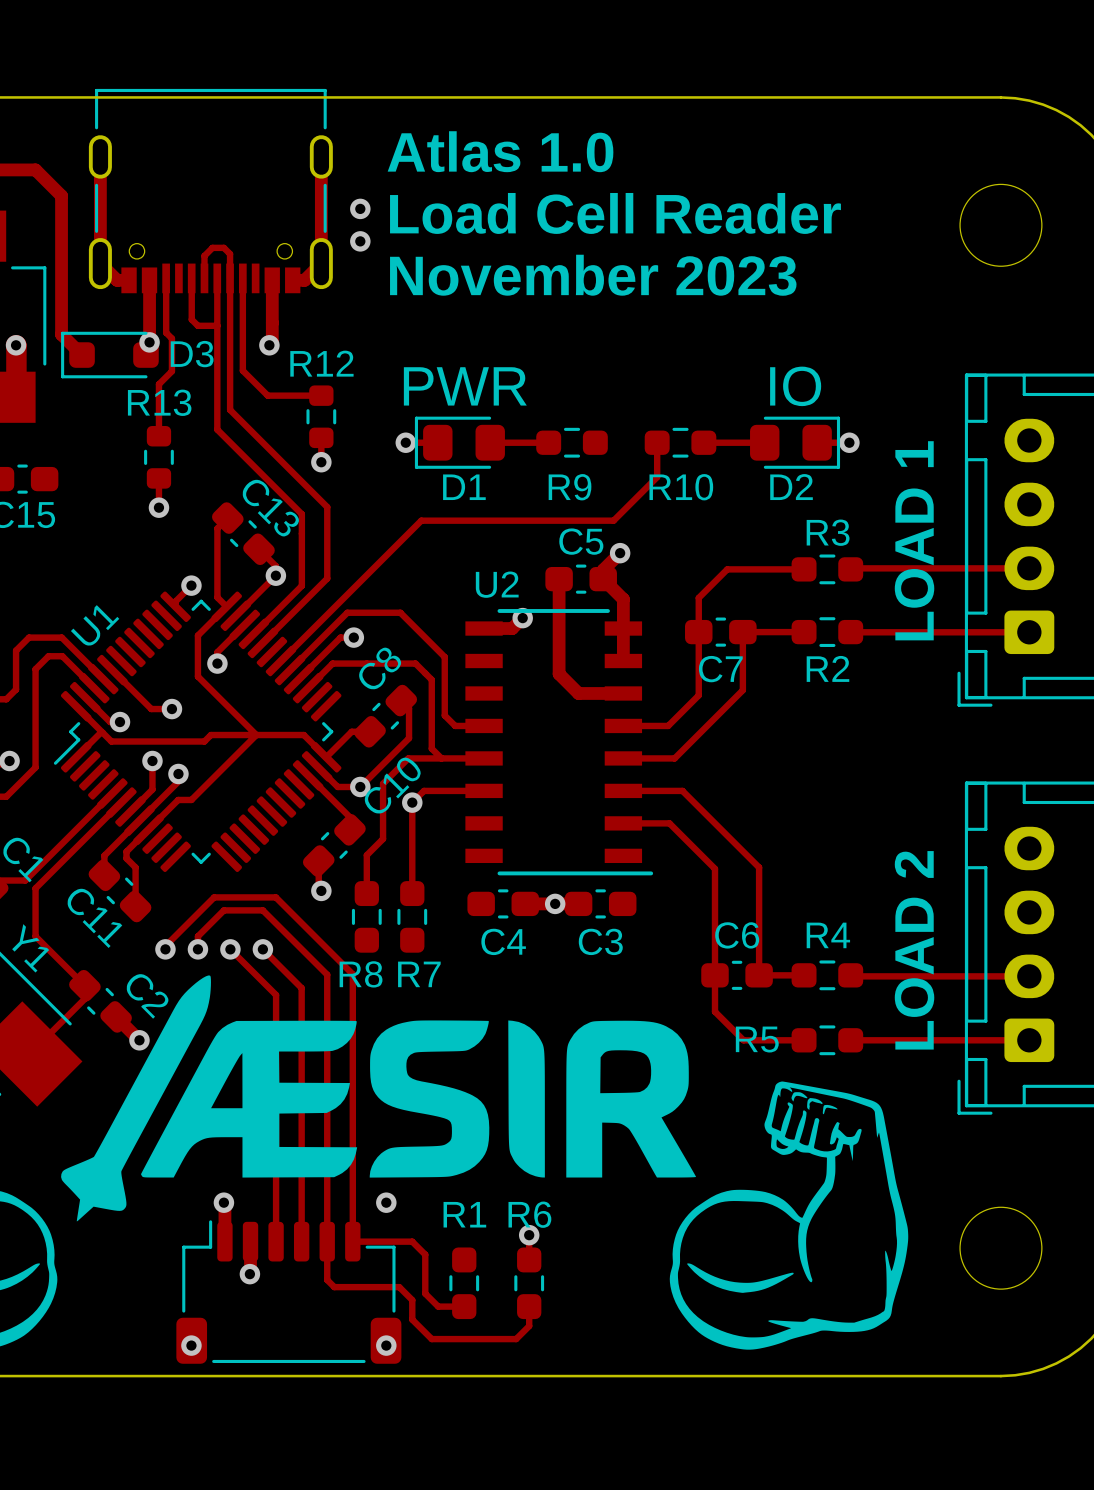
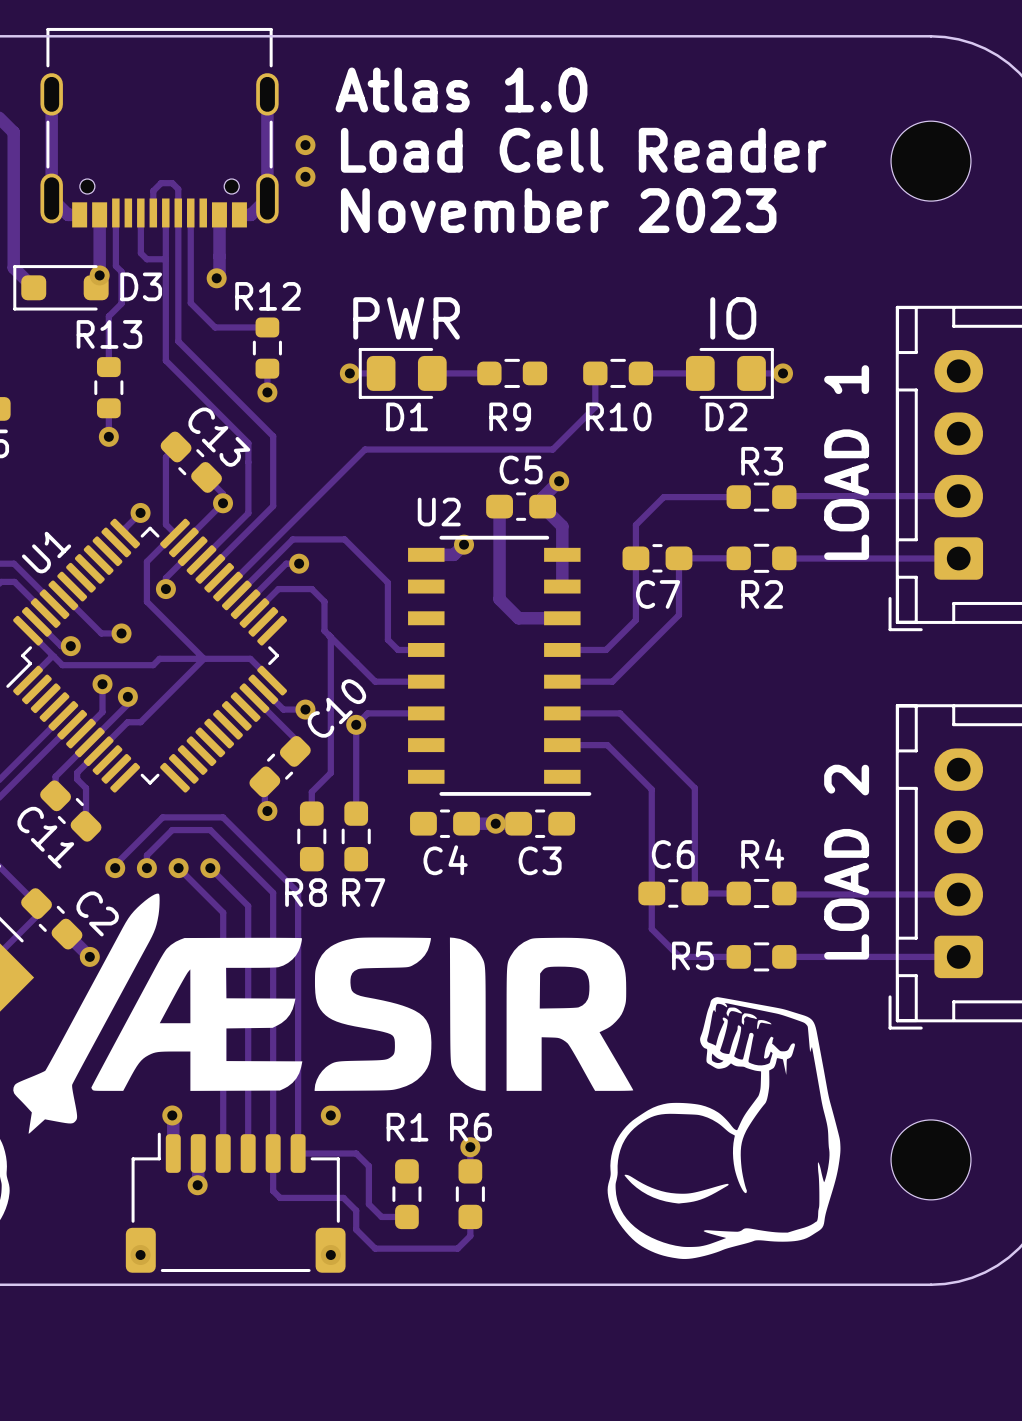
track: (366, 663) (415, 663) (431, 679) (431, 748) (441, 758) -> (311, 589) (324, 601) (324, 630) (375, 681)
track: (401, 700) (409, 708) (409, 738) (360, 786) -> none
C8: (385, 716) -> none
track: (370, 731) (351, 731) (326, 757) -> none
track: (431, 758) (408, 758) (383, 783) (383, 838) (366, 855) (366, 871) -> (330, 637) (330, 772) (311, 792)

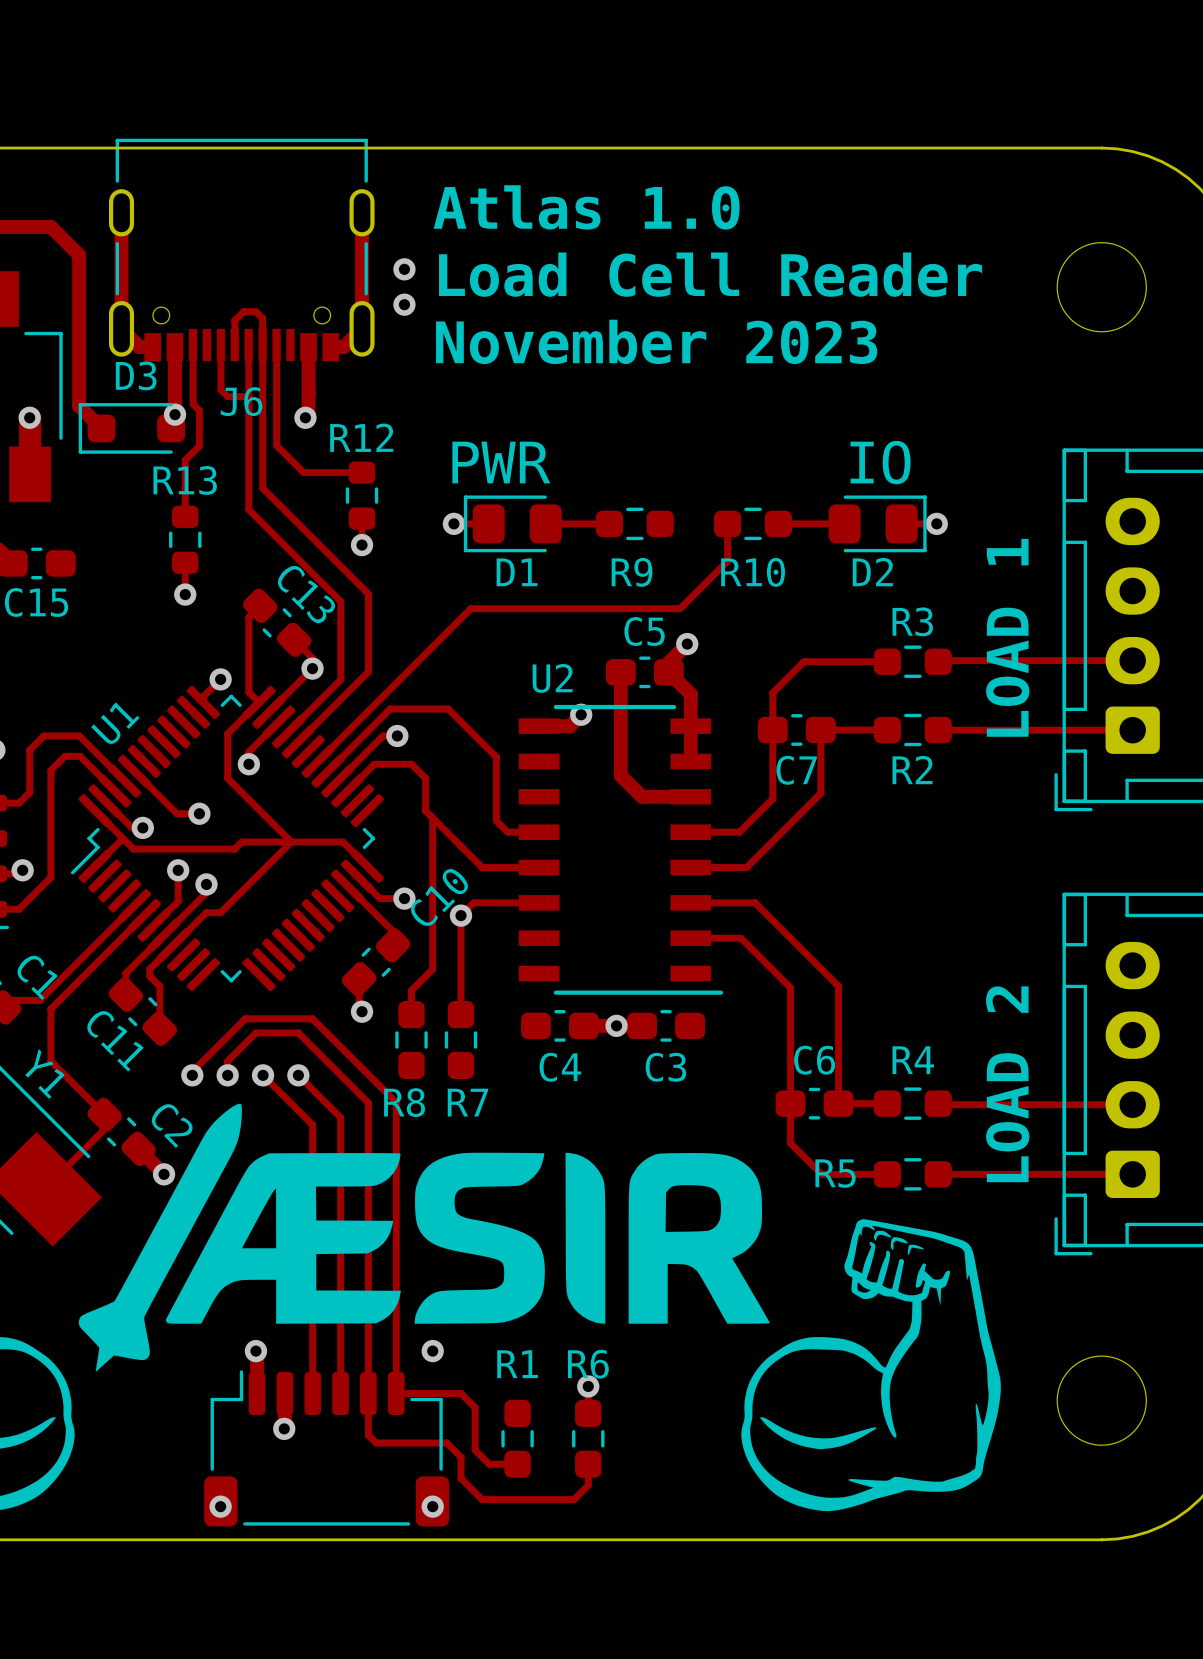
J6 name: none -> J6 (241, 401)
D3 name position: D3 (141, 286) -> D3 (136, 375)

